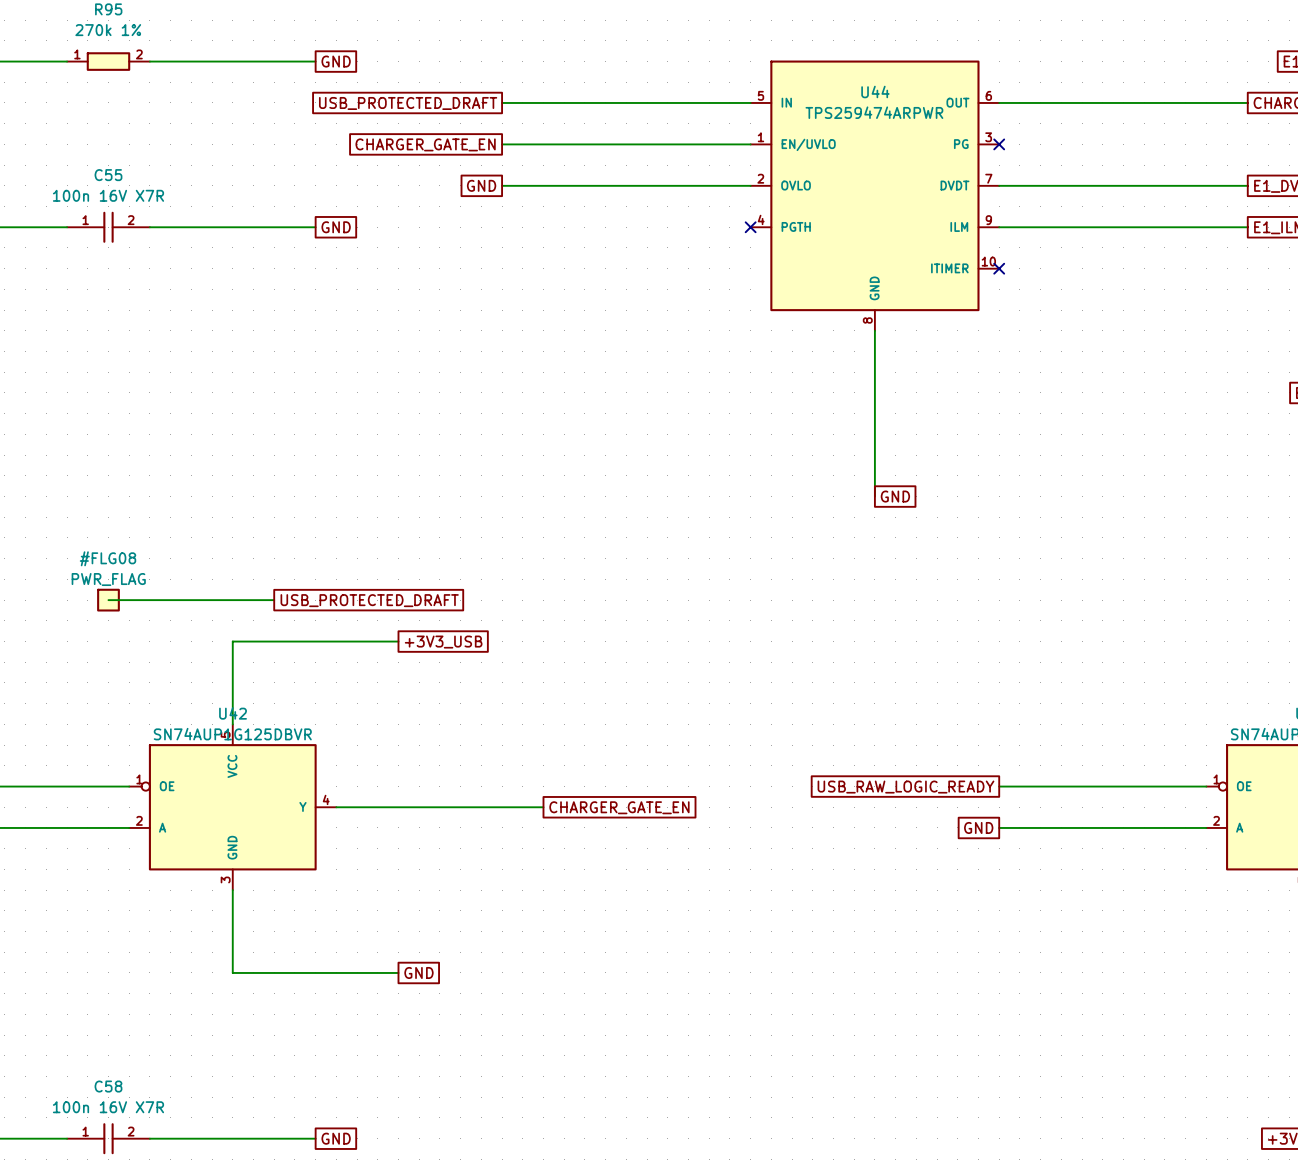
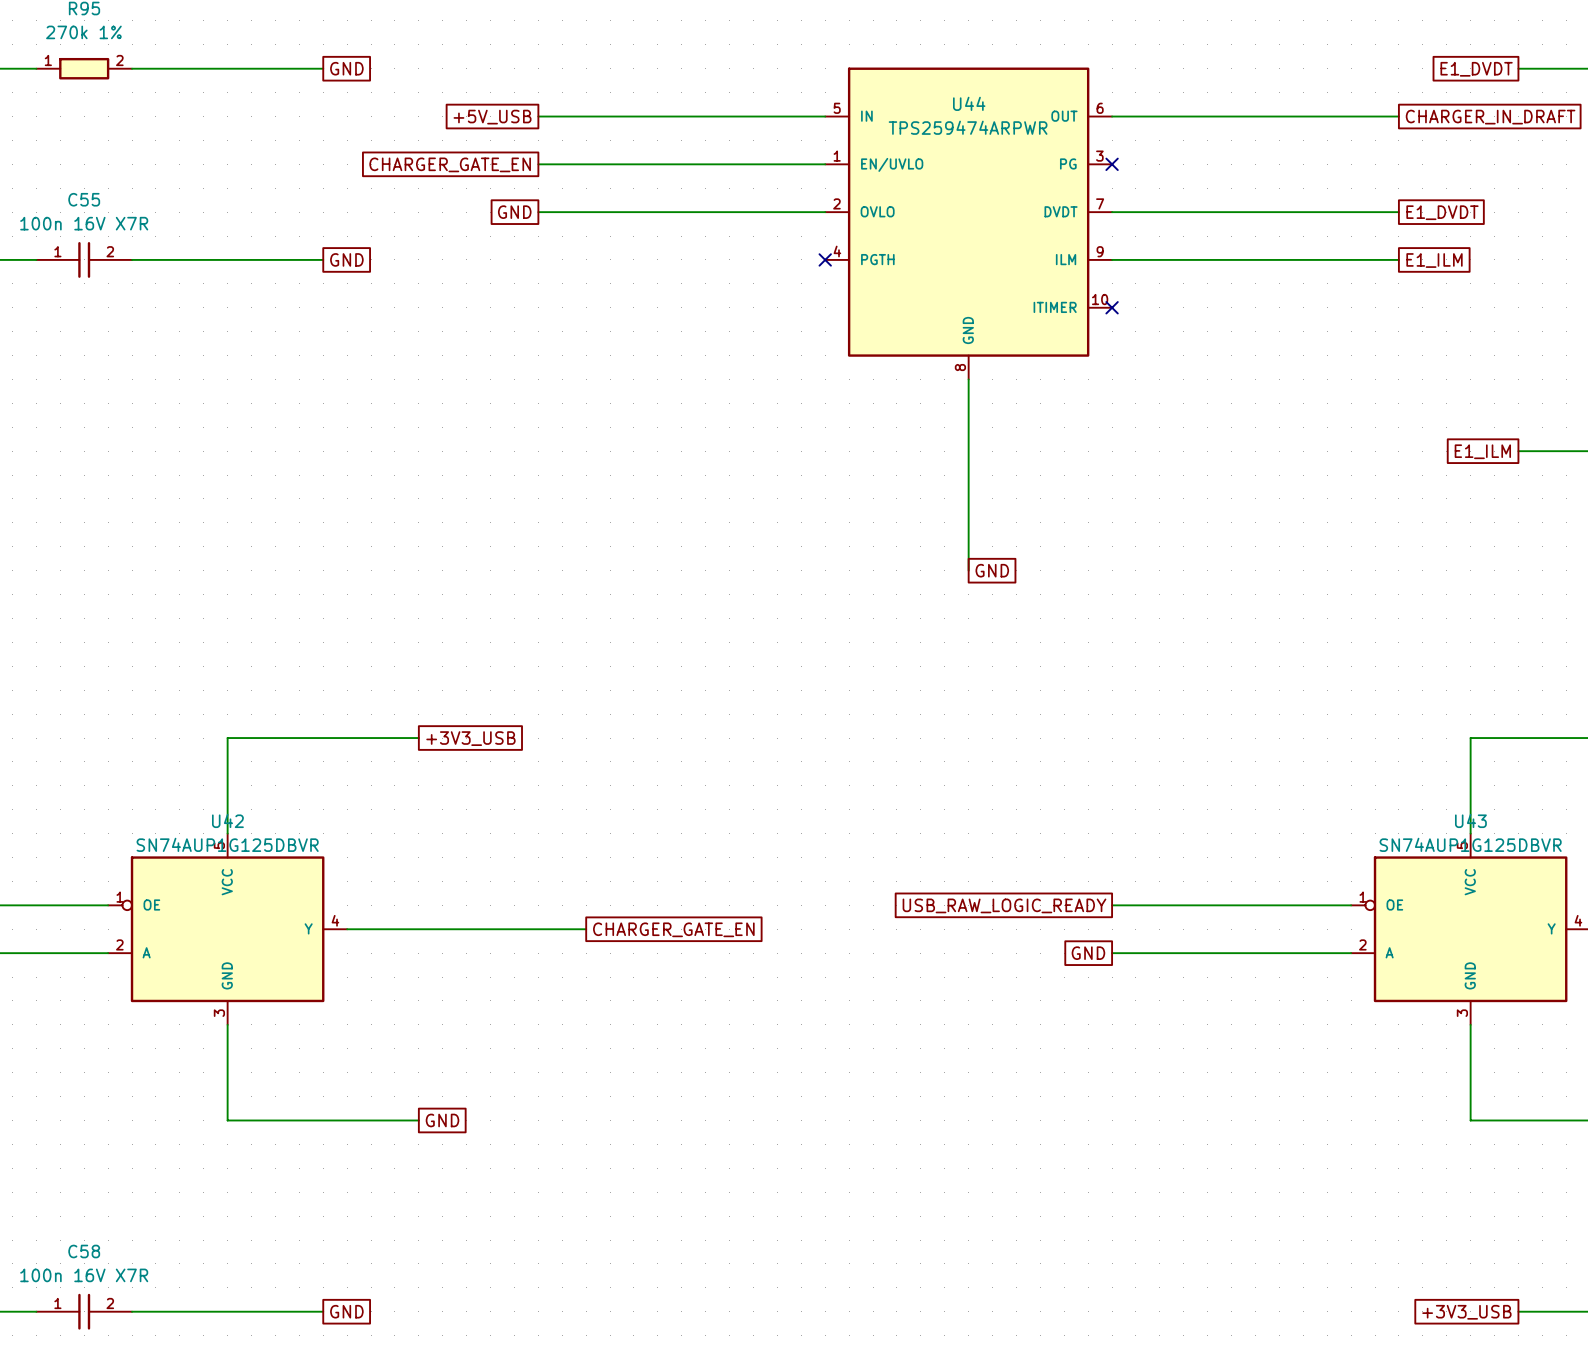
global label: USB_PROTECTED_DRAFT (408, 103) -> +5V_USB (492, 117)
wire: (108, 600) (274, 600) -> none
#FLG08: PWR_FLAG (108, 600) -> none
global label: USB_PROTECTED_DRAFT (369, 600) -> none

